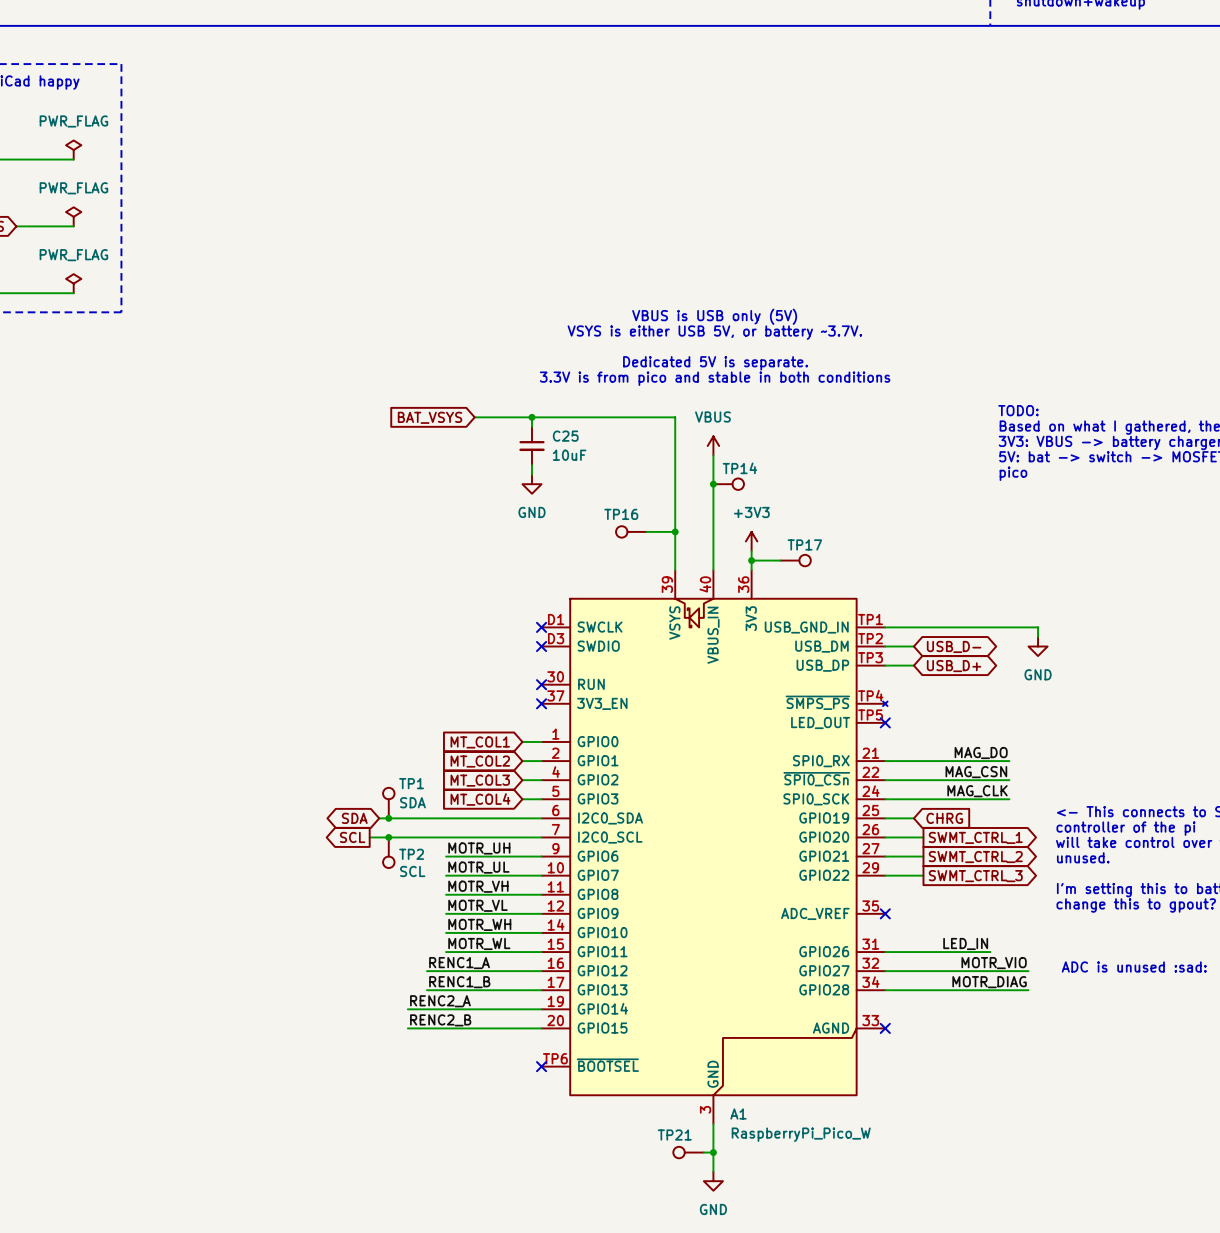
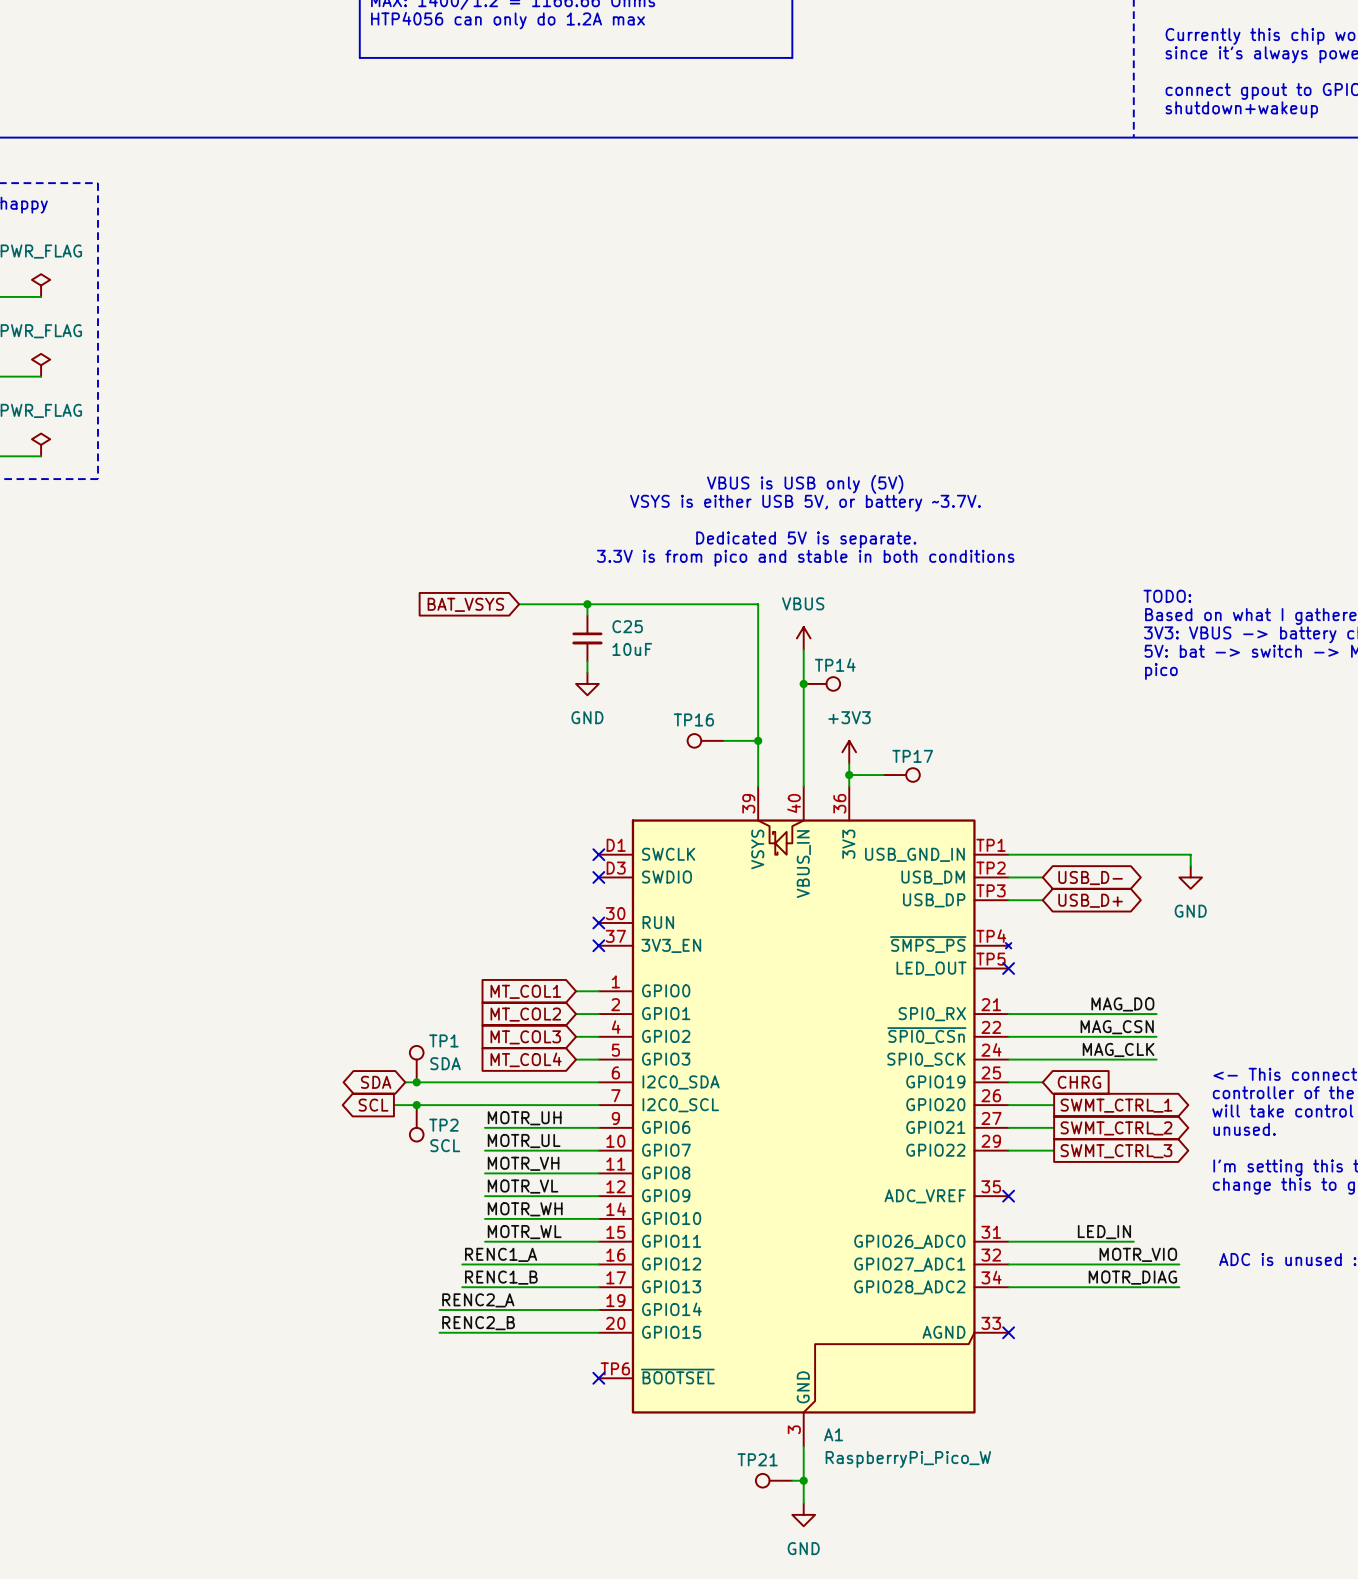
A1 pin name: GPIO26 (824, 951) -> GPIO26_ADC0 (909, 1241)
A1 pin name: GPIO27 (824, 970) -> GPIO27_ADC1 (909, 1264)
A1 pin name: GPIO28 (824, 989) -> GPIO28_ADC2 (909, 1287)

